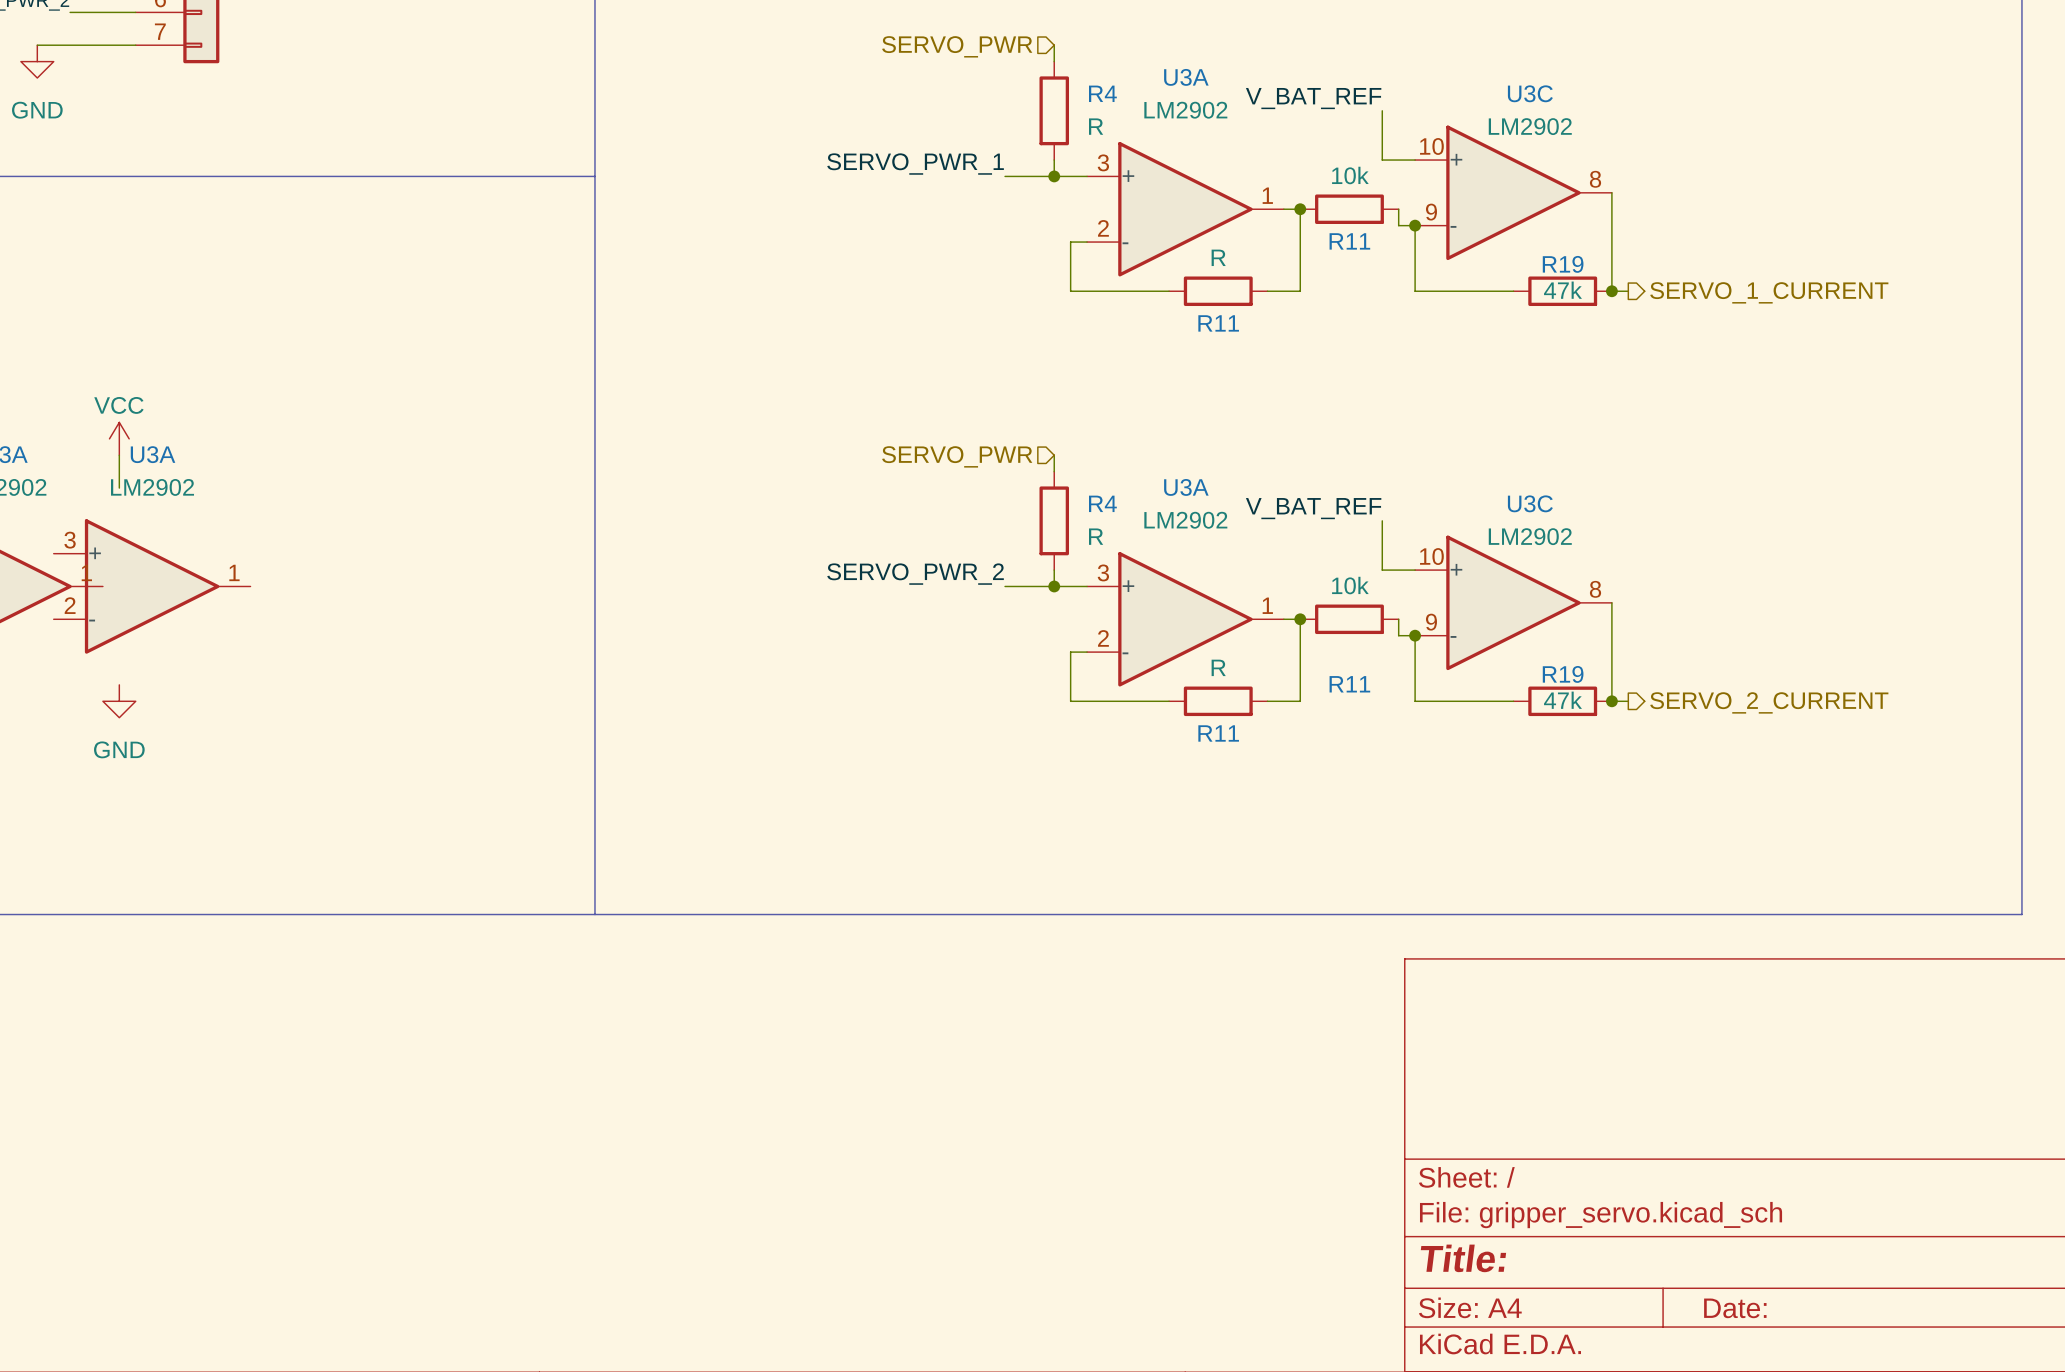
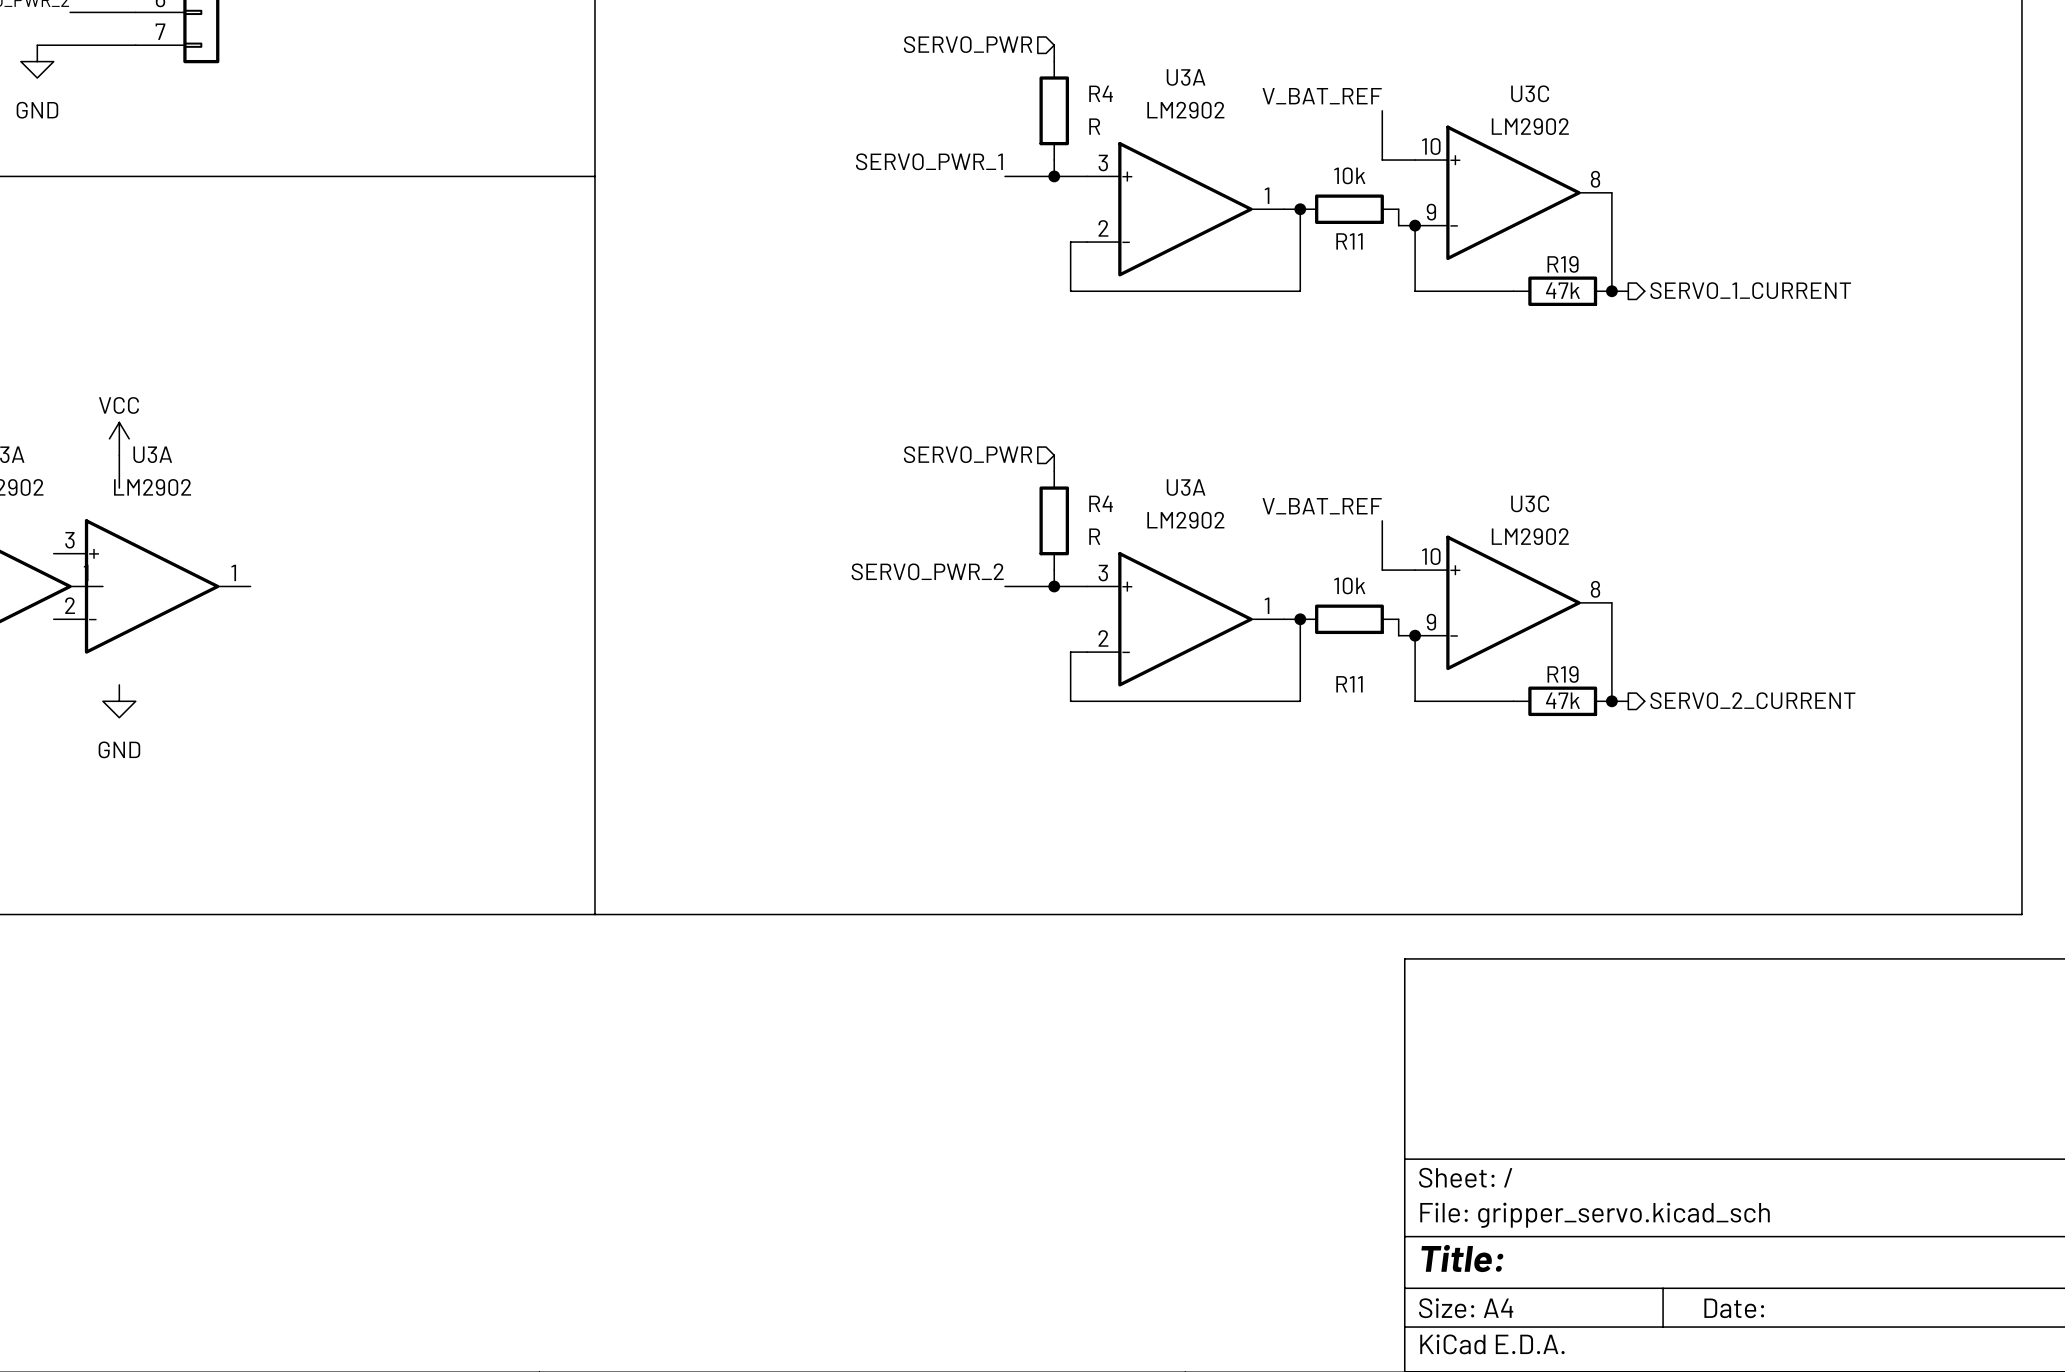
wire: none -> (1169, 291) (1267, 291)
R11: R (1218, 291) -> none
wire: none -> (1169, 701) (1267, 701)
R11: R (1218, 701) -> none

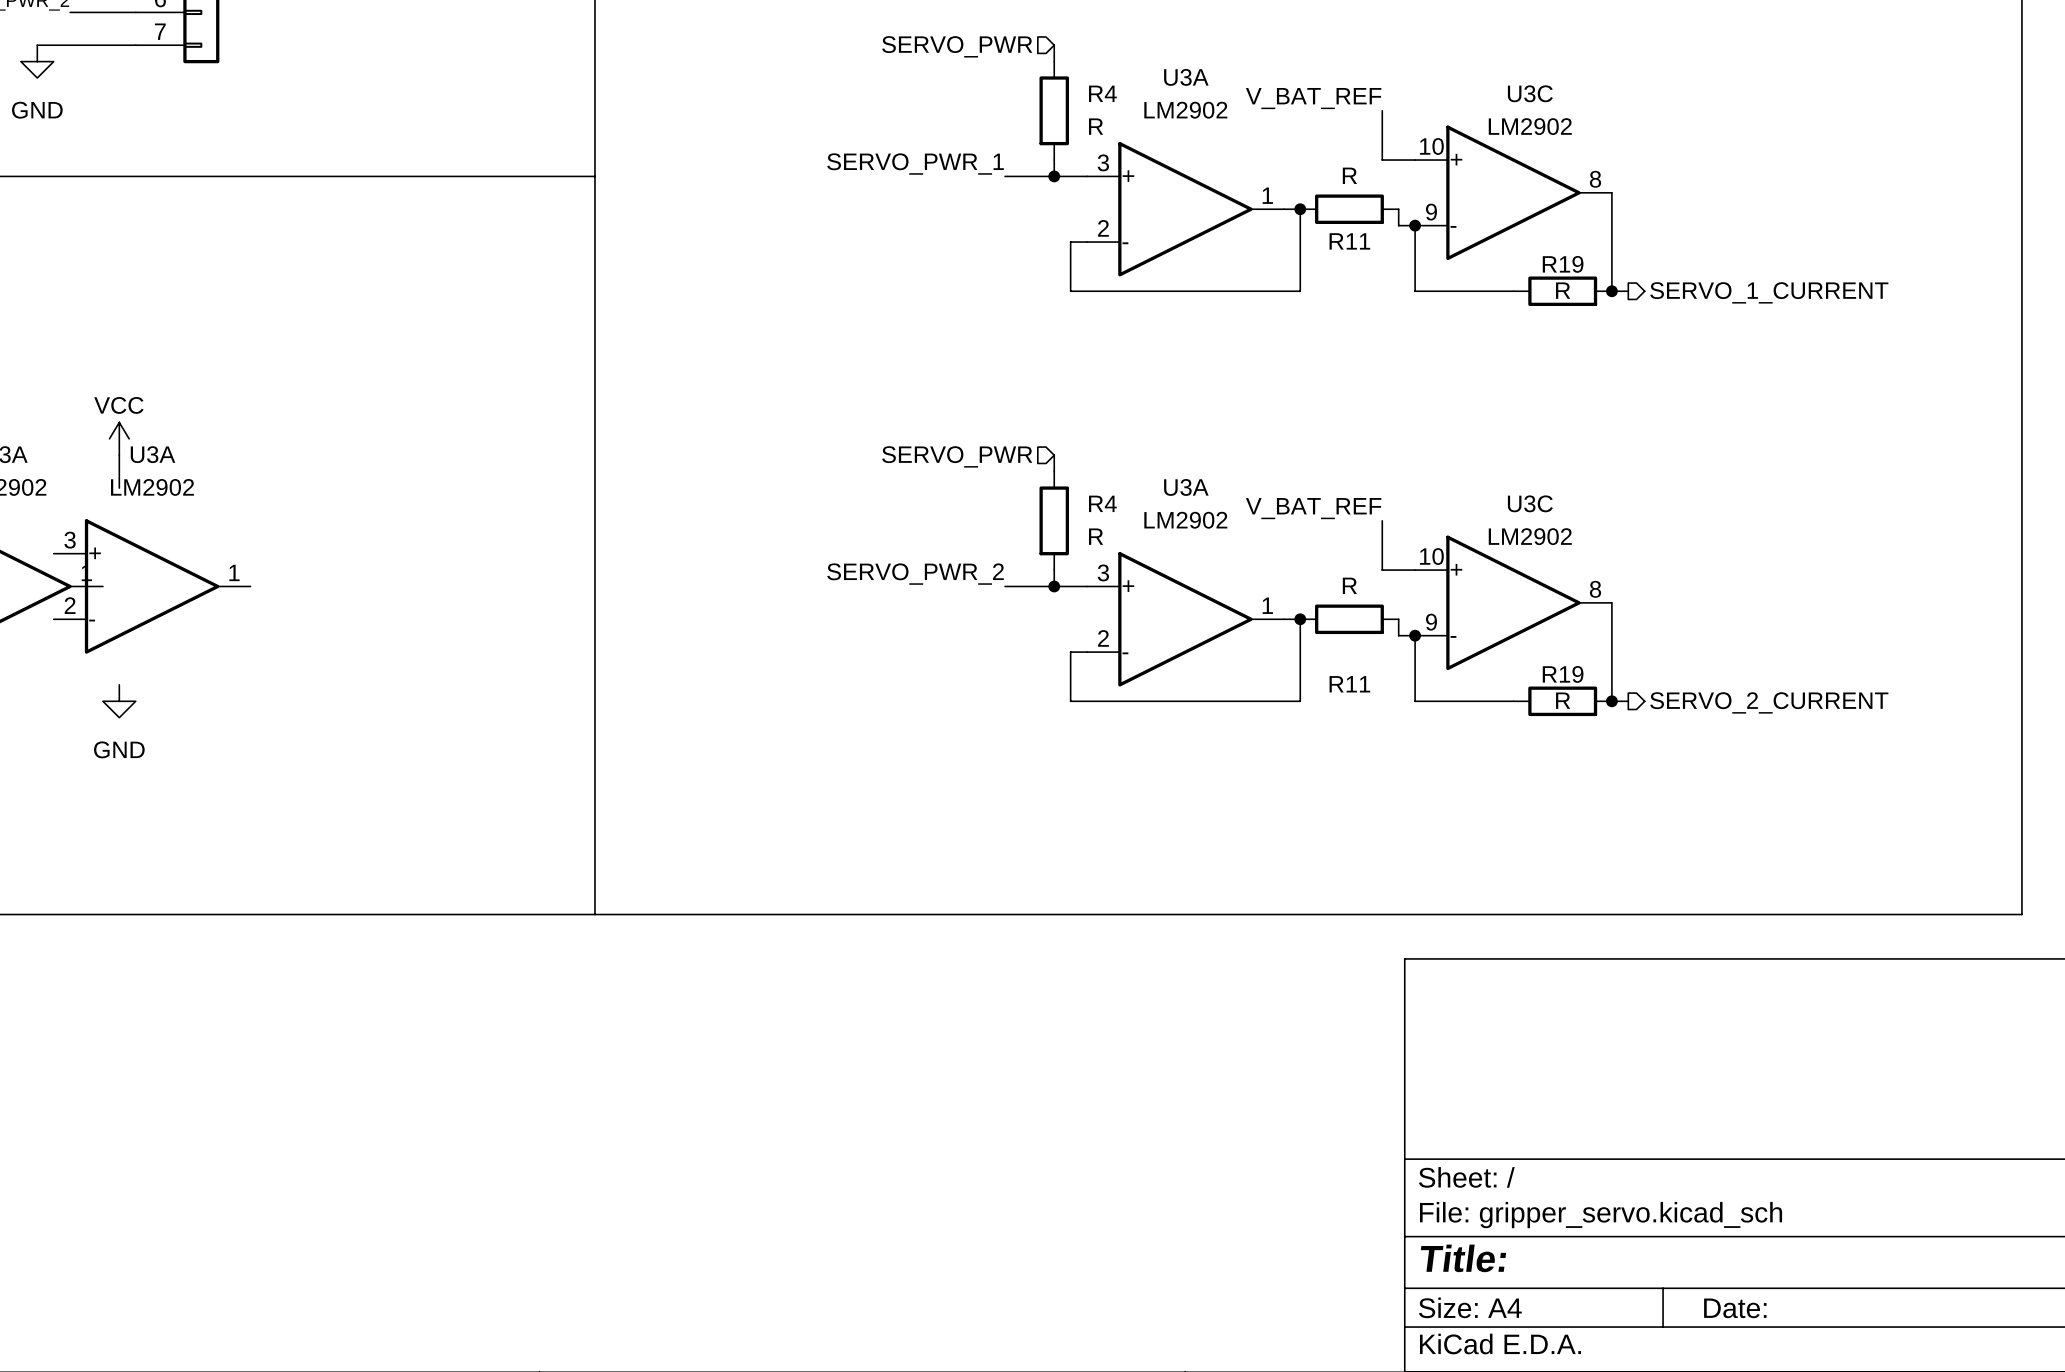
R11 value: 10k (1349, 175) -> R (1349, 175)
R19 value: 47k (1562, 290) -> R (1563, 290)
R11 value: 10k (1349, 585) -> R (1349, 585)
R19 value: 47k (1562, 700) -> R (1563, 700)

